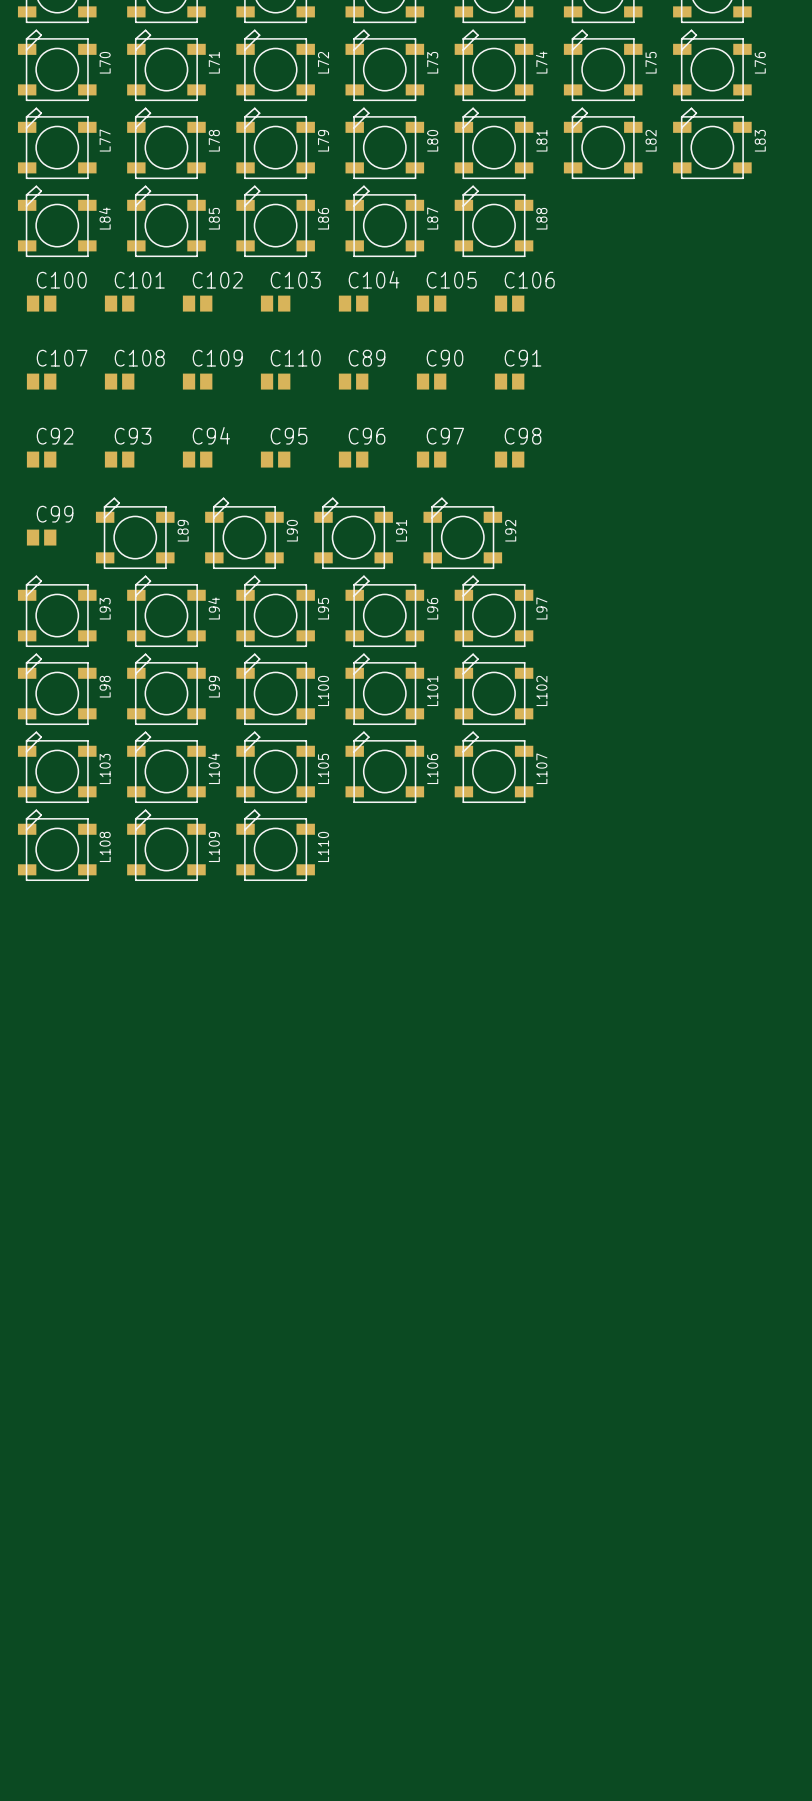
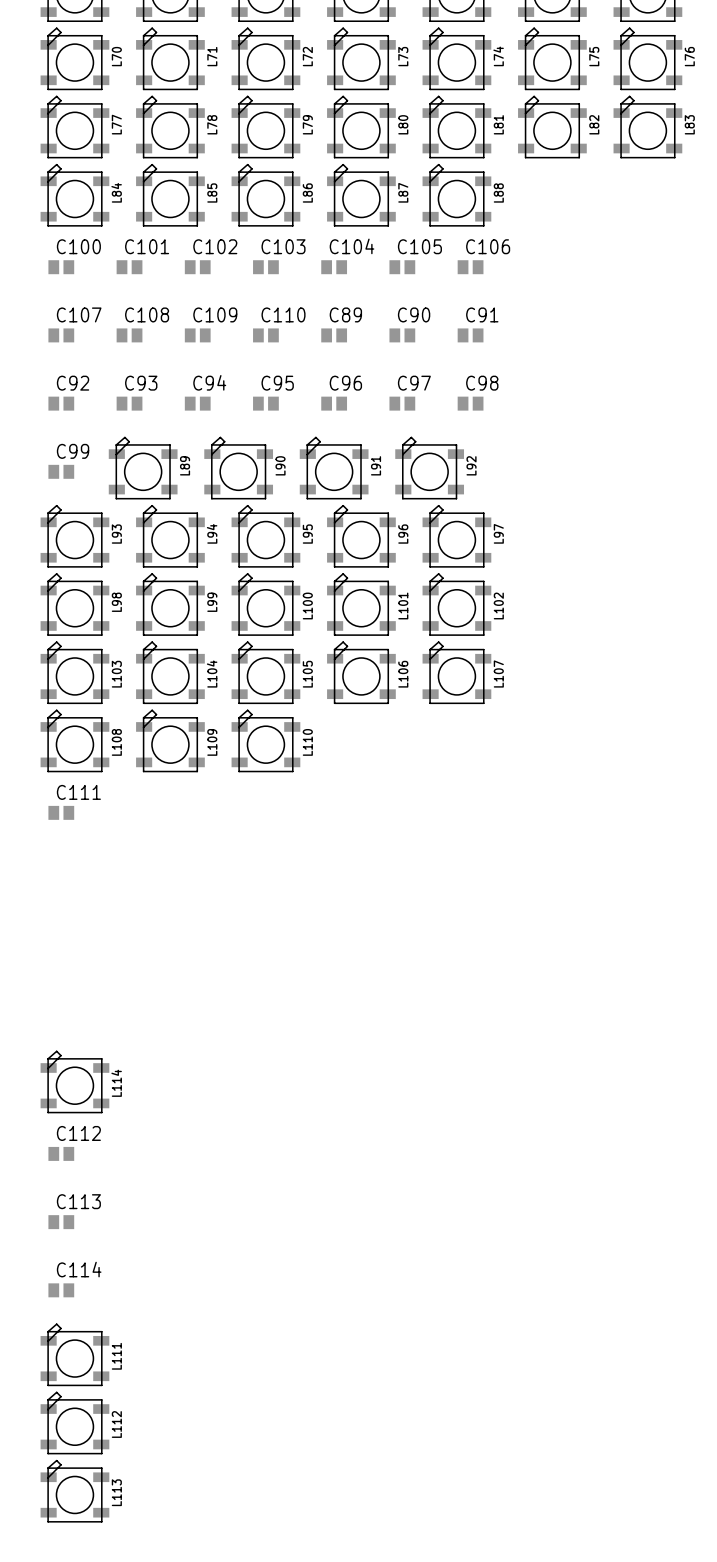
C111: none -> (61, 812)
L114: none -> (74, 1081)
C112: none -> (61, 1153)
C113: none -> (61, 1222)
C114: none -> (61, 1290)
L111: none -> (74, 1354)
L112: none -> (74, 1423)
L113: none -> (74, 1491)

